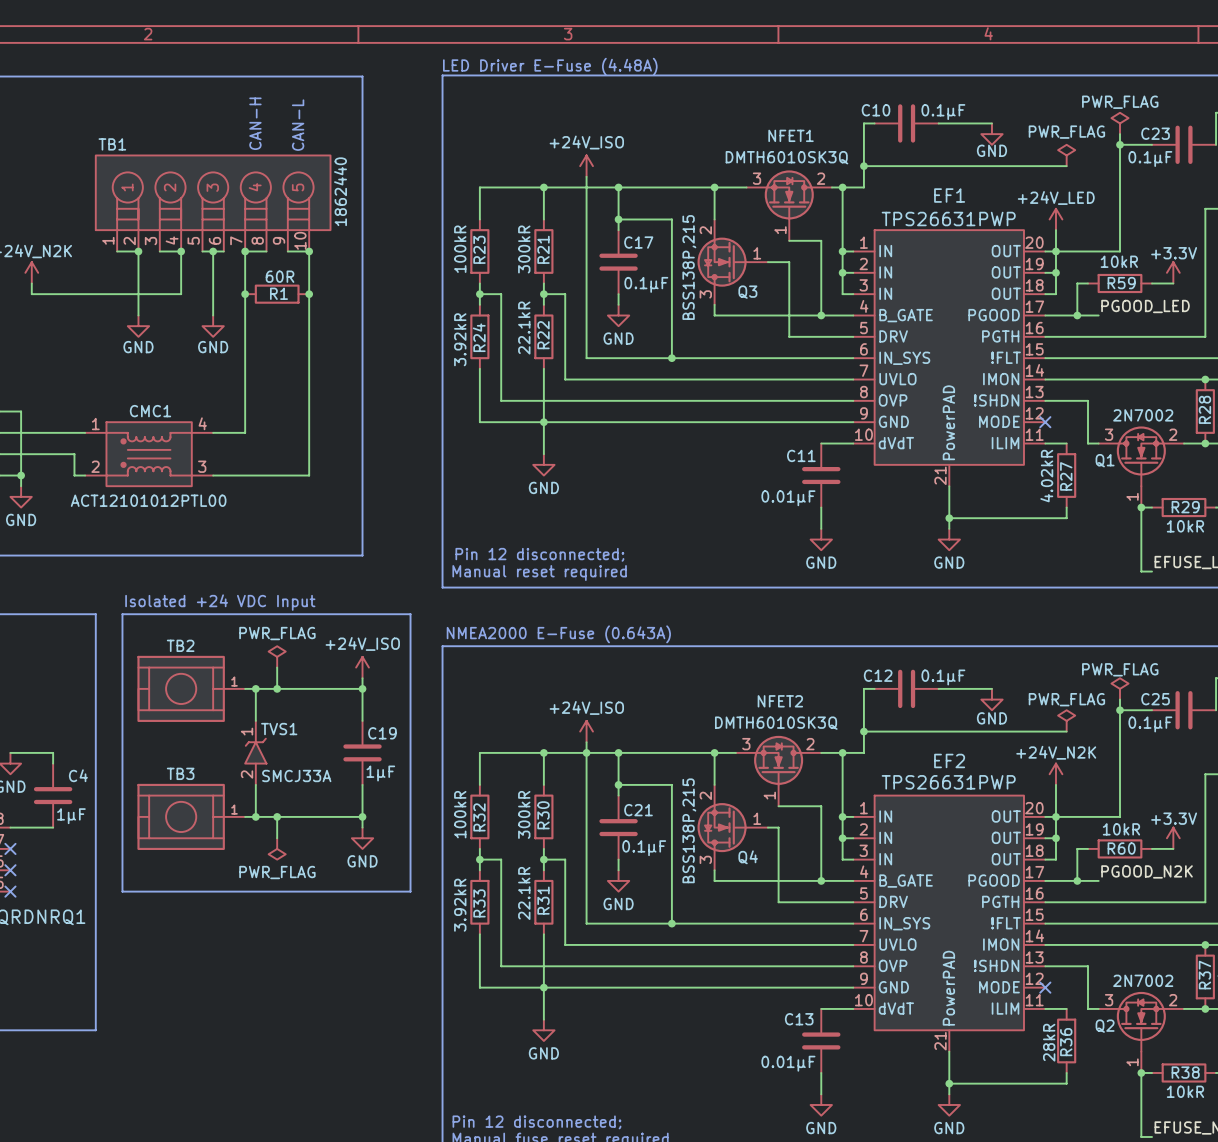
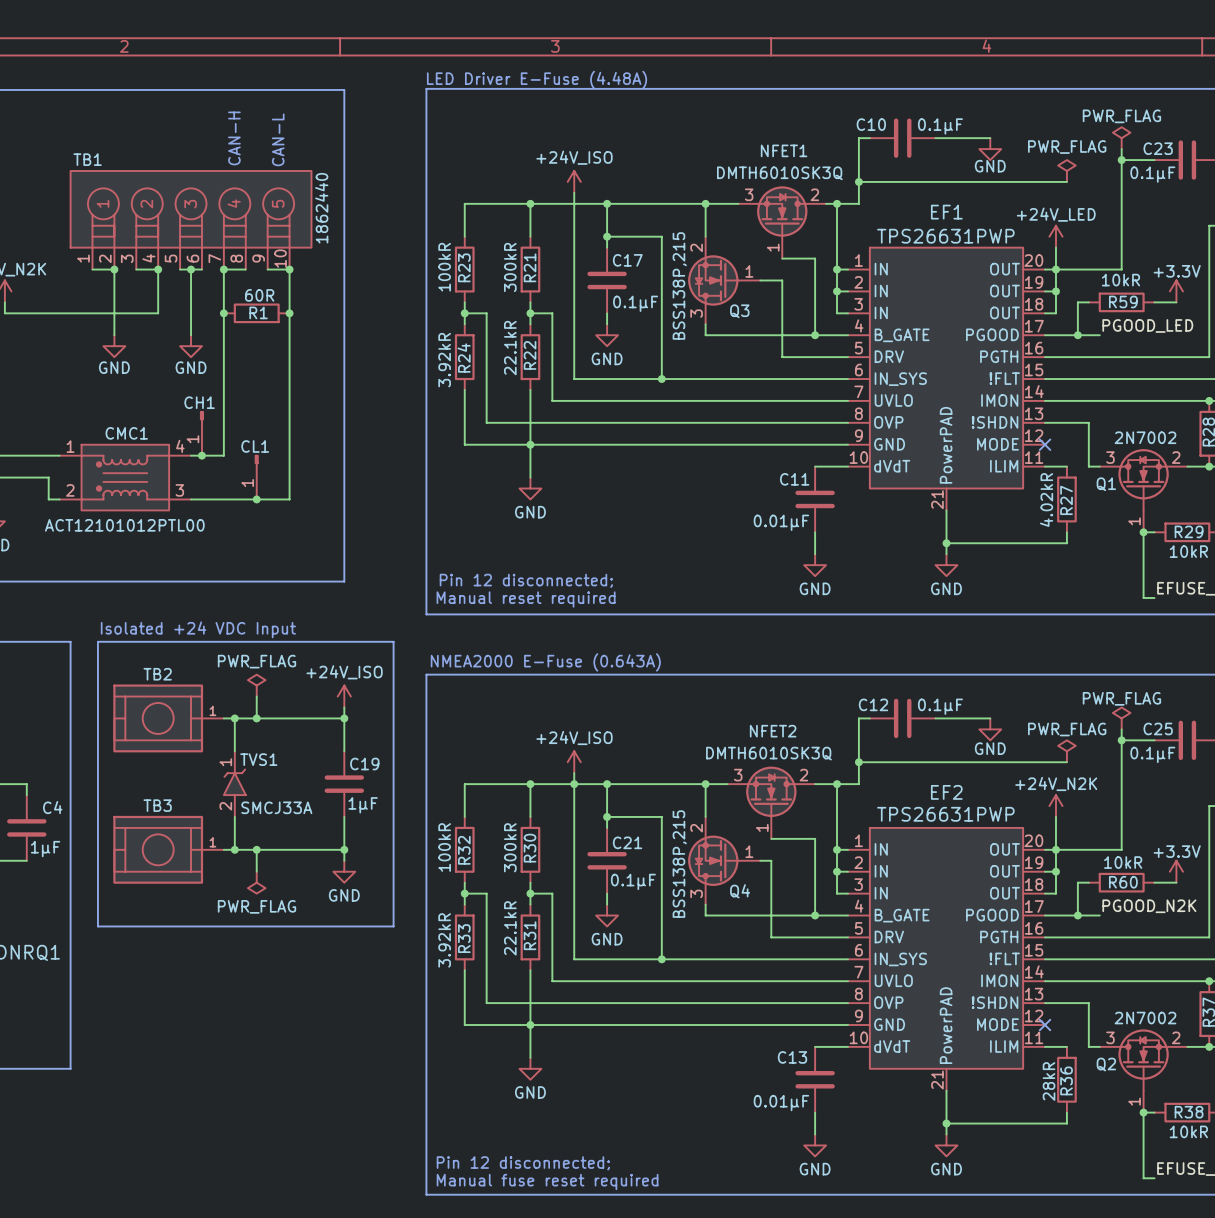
CH1: none -> (201, 433)
junction: none -> (201, 455)
CL1: none -> (256, 477)
junction: none -> (256, 499)

